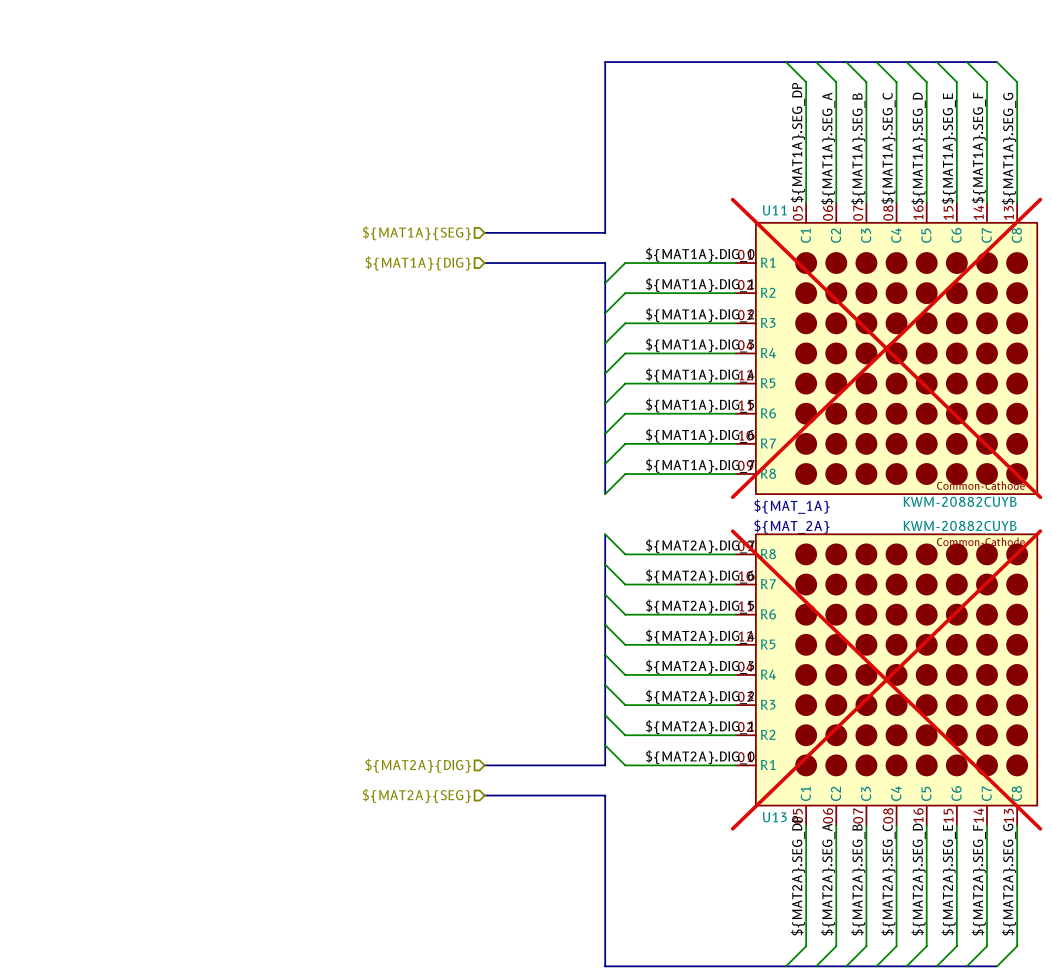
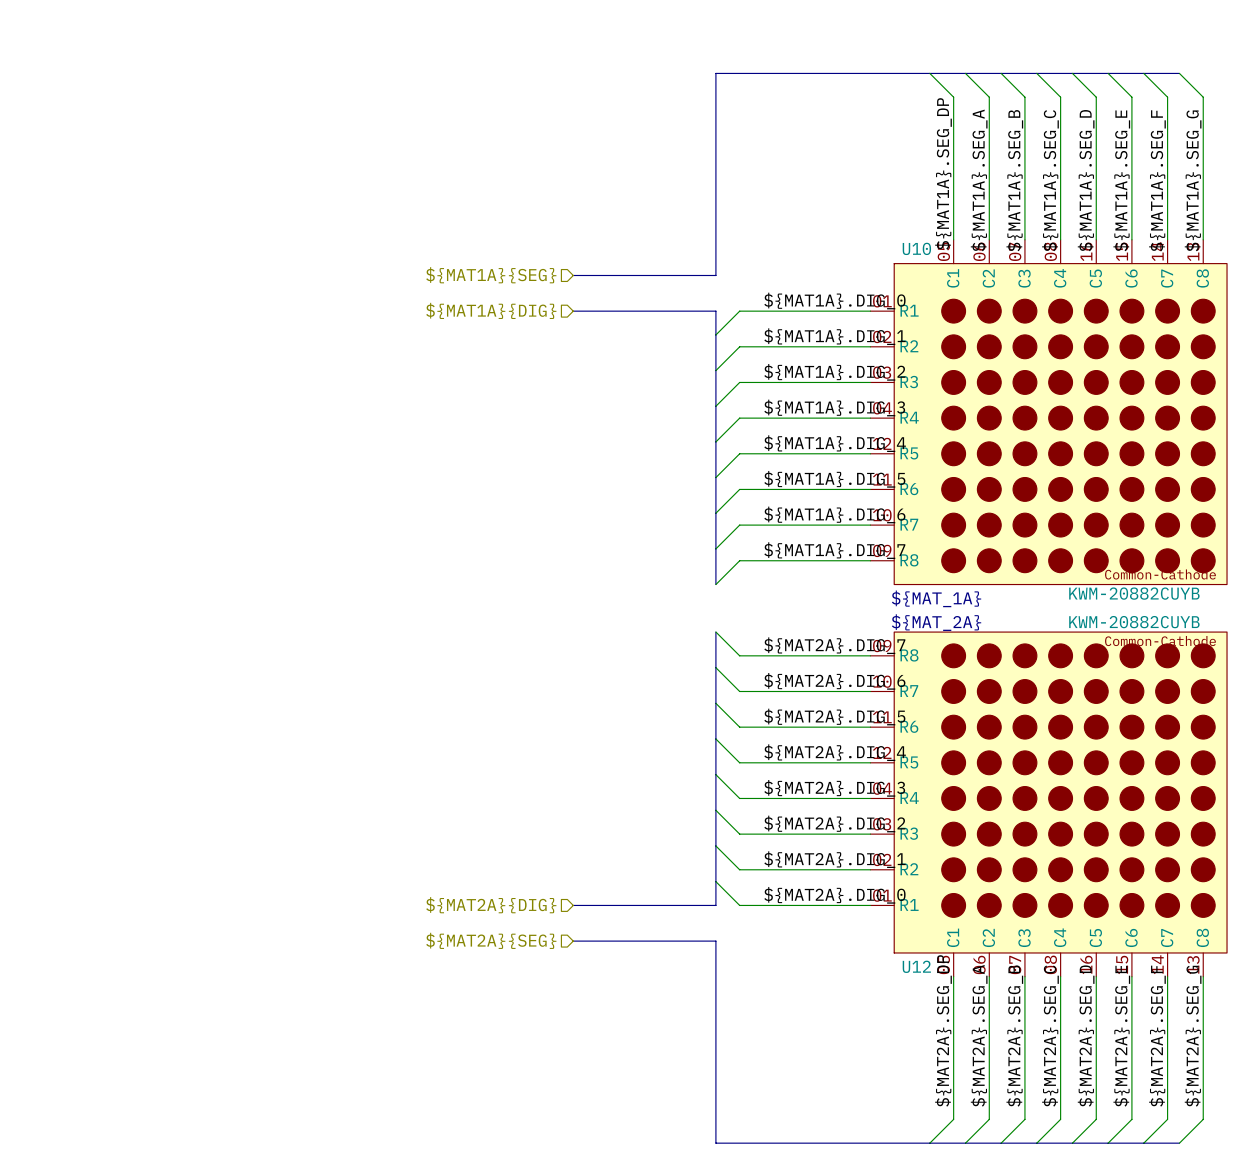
U11 name: U11 (774, 210) -> U10 (916, 248)
U11 do-not-place cross: (886, 348) -> none
U13 do-not-place cross: (886, 679) -> none
U13 name: U13 (774, 817) -> U12 (916, 966)

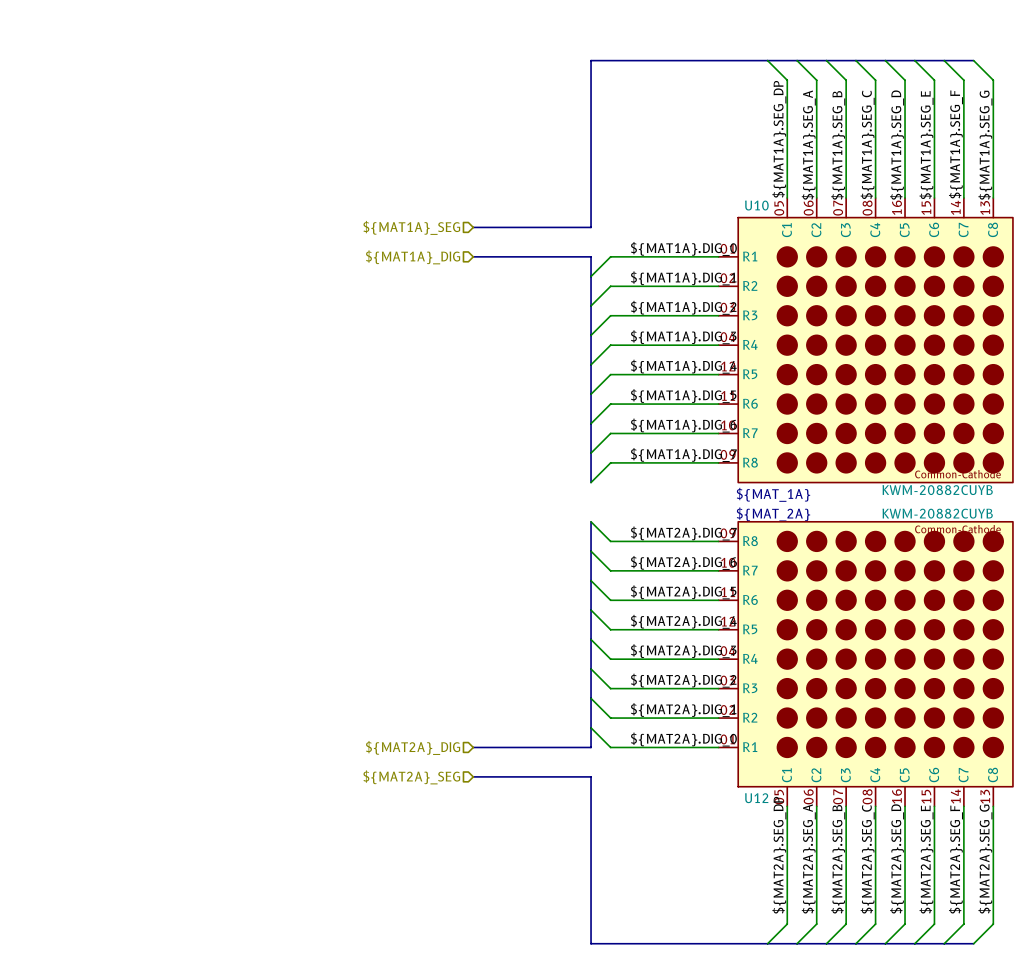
hierarchical label: ${MAT1A}{SEG} (491, 275) -> ${MAT1A}_SEG (411, 227)
hierarchical label: ${MAT1A}{DIG} (491, 310) -> ${MAT1A}_DIG (413, 257)
hierarchical label: ${MAT2A}{DIG} (491, 905) -> ${MAT2A}_DIG (413, 747)
hierarchical label: ${MAT2A}{SEG} (491, 940) -> ${MAT2A}_SEG (411, 777)

